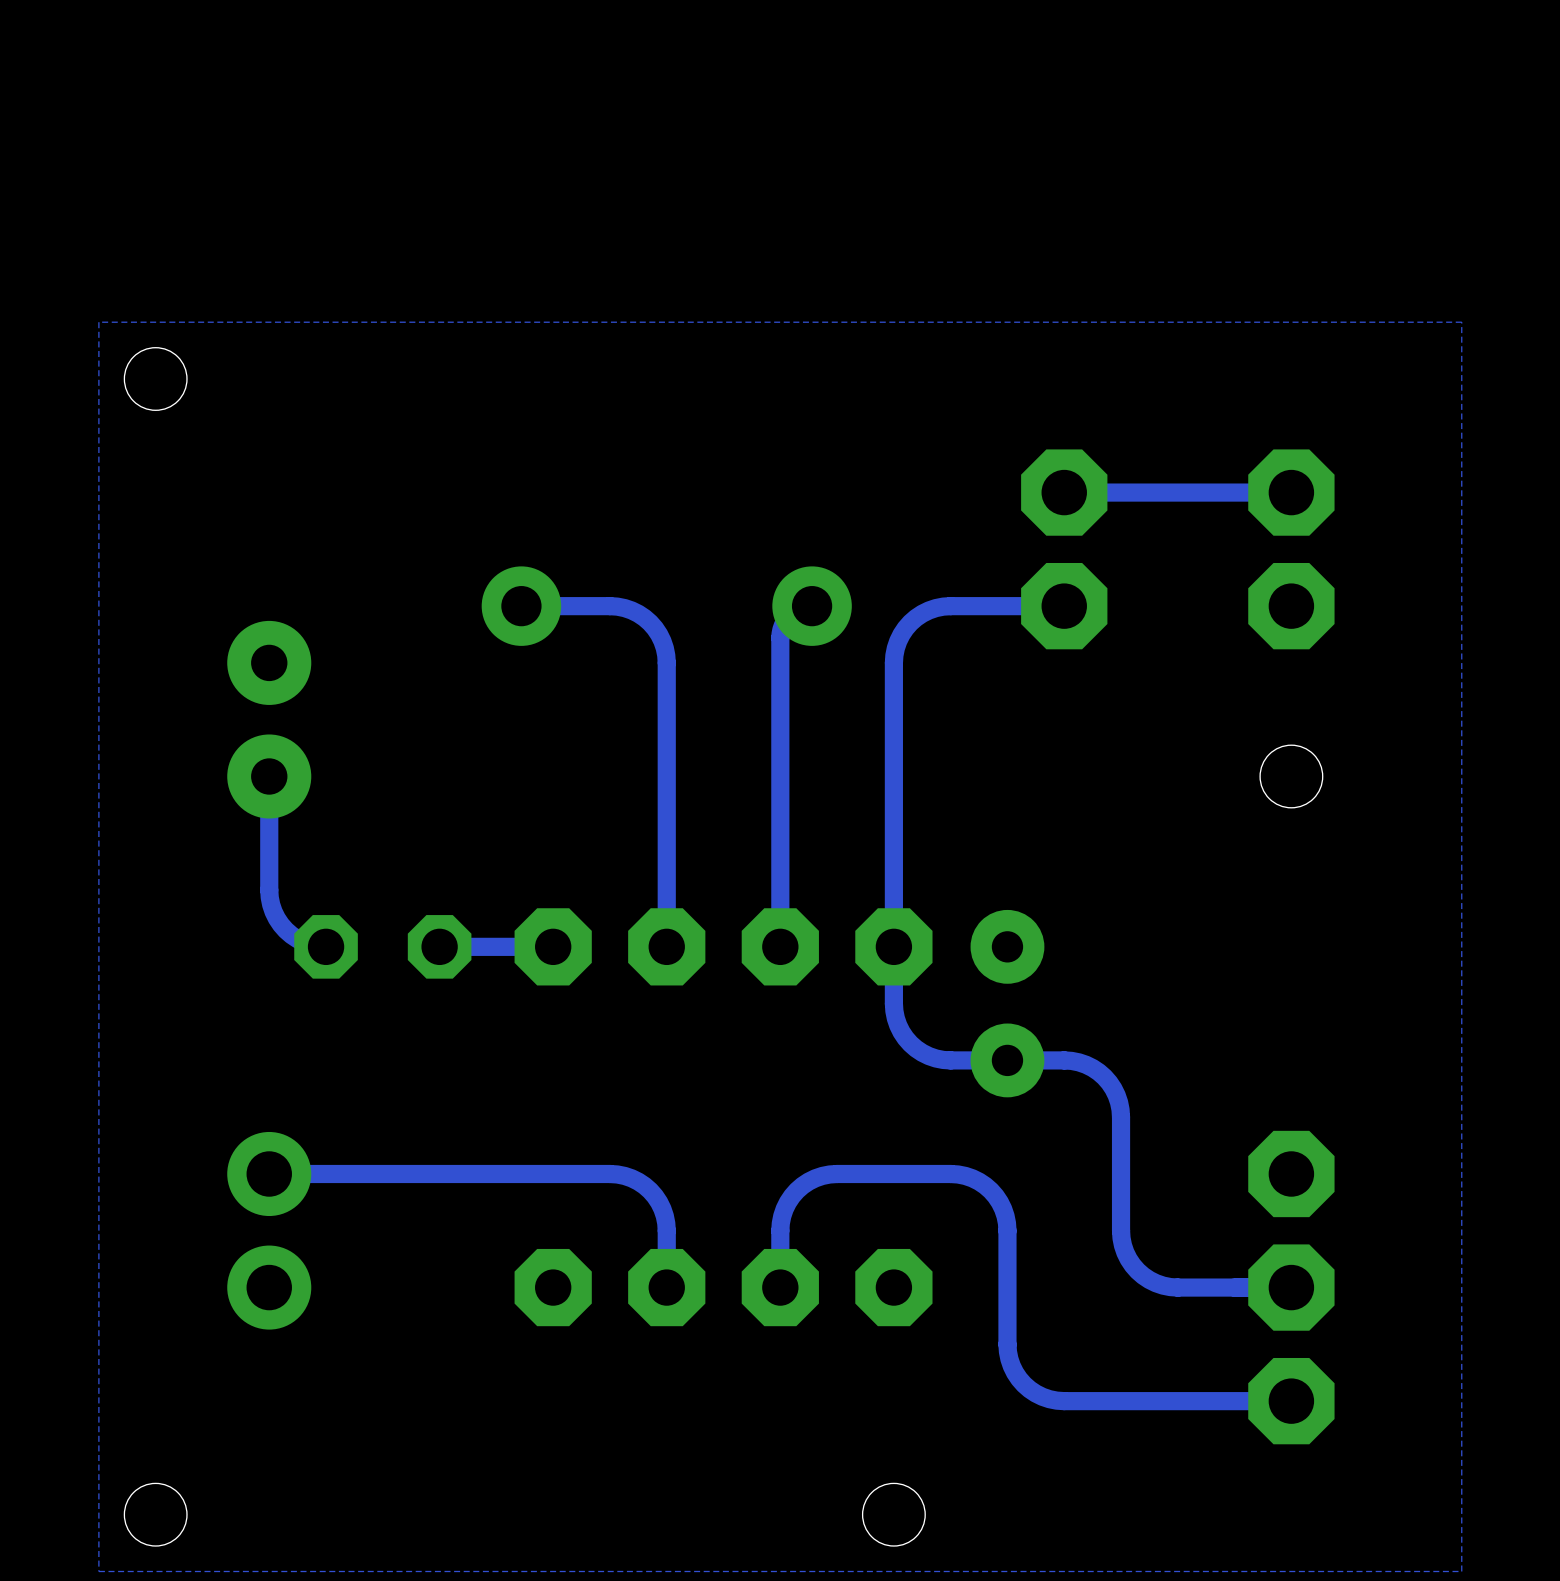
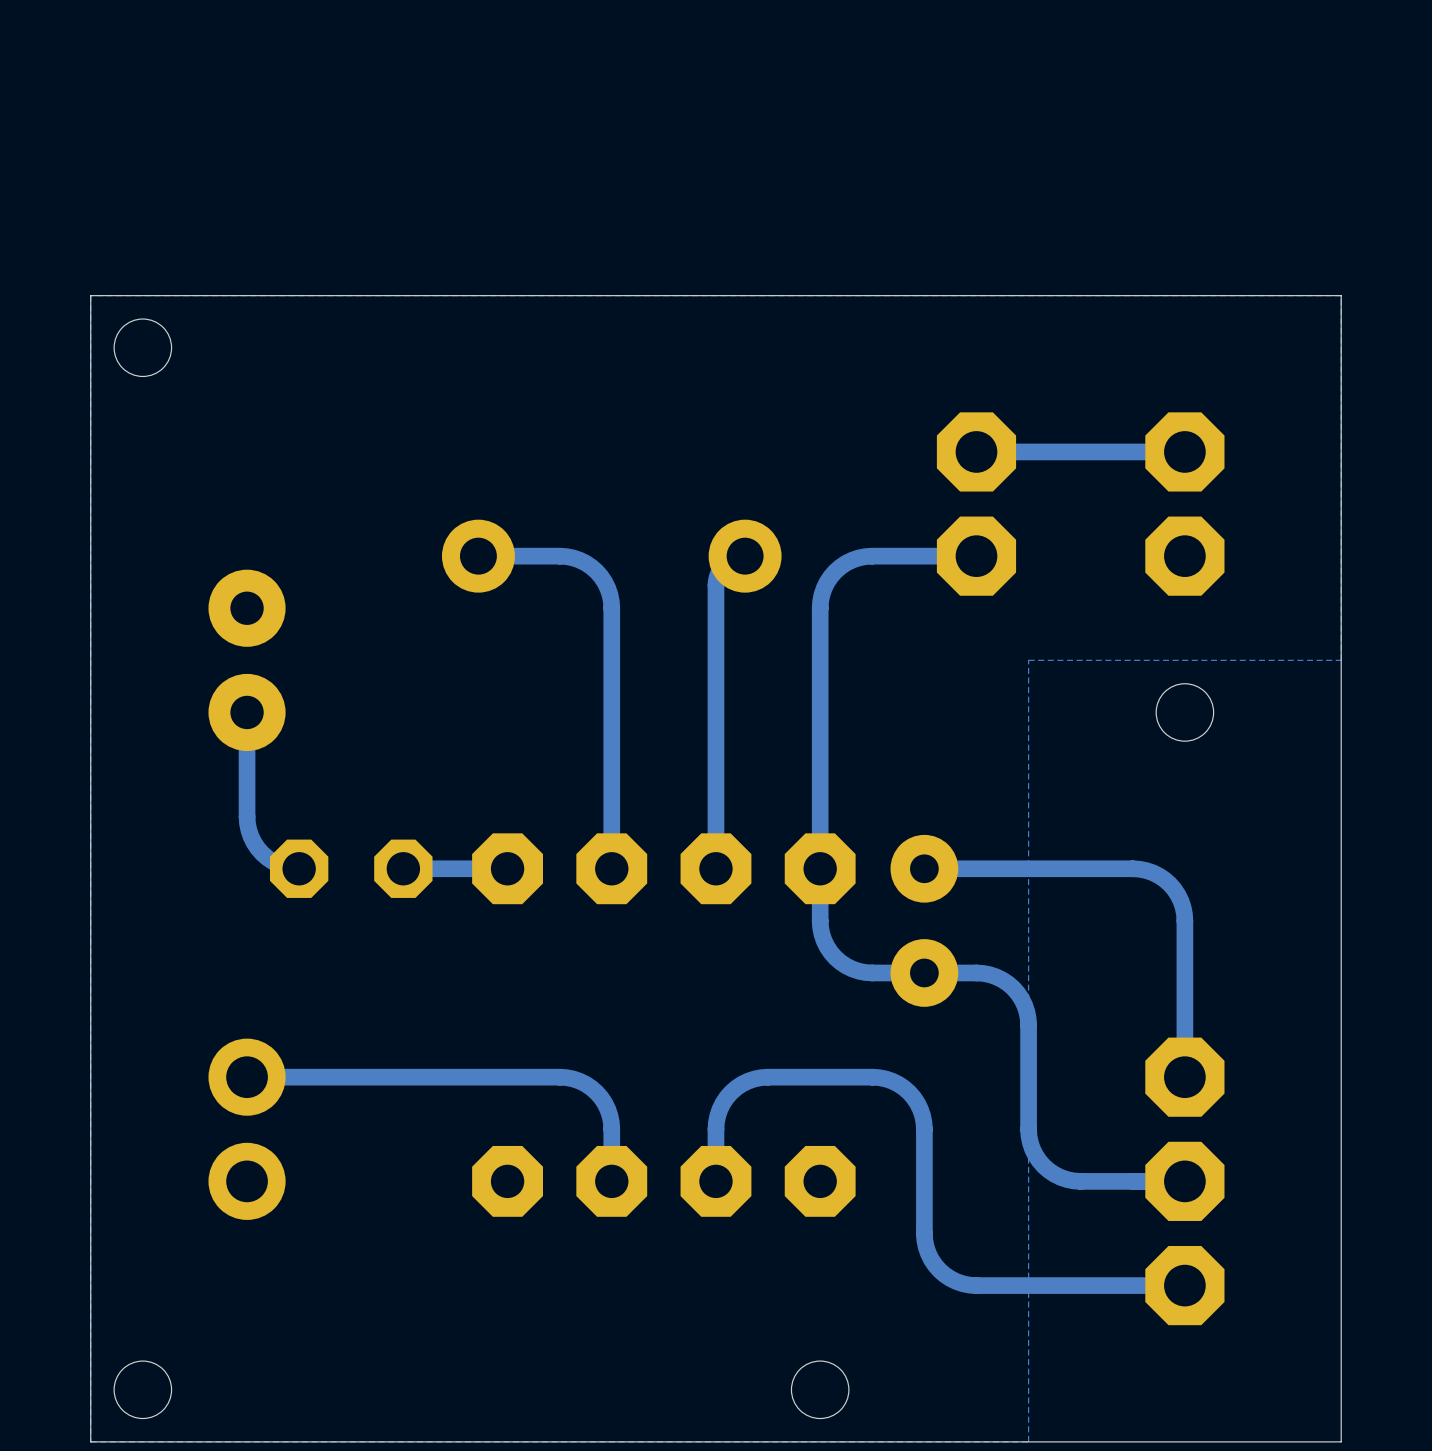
board edge: none -> (1341, 295) (90, 295) (90, 1441) (1341, 1441) (1341, 295)
bottom zone outline: (1461, 719) (1461, 1571) (1121, 1571) -> (1341, 660) (1028, 660) (1028, 1441)
bottom track: none -> (924, 868) (1132, 868) (1146, 870) (1164, 879) (1177, 894) (1184, 914) (1184, 1077)

